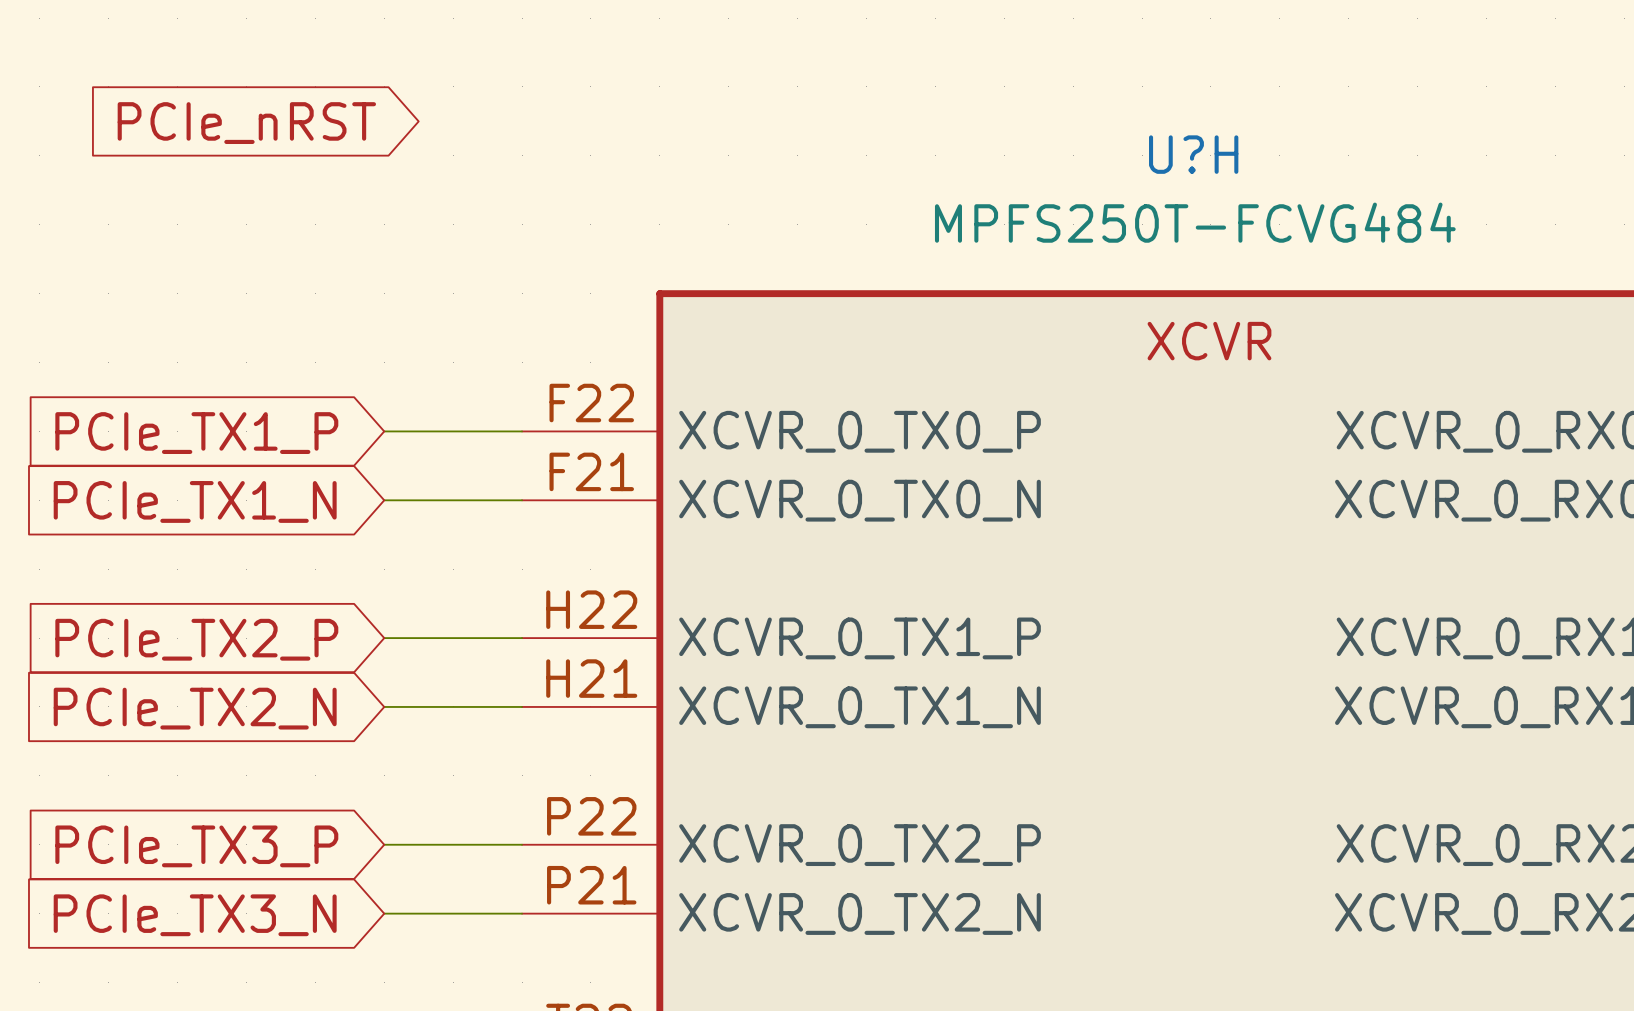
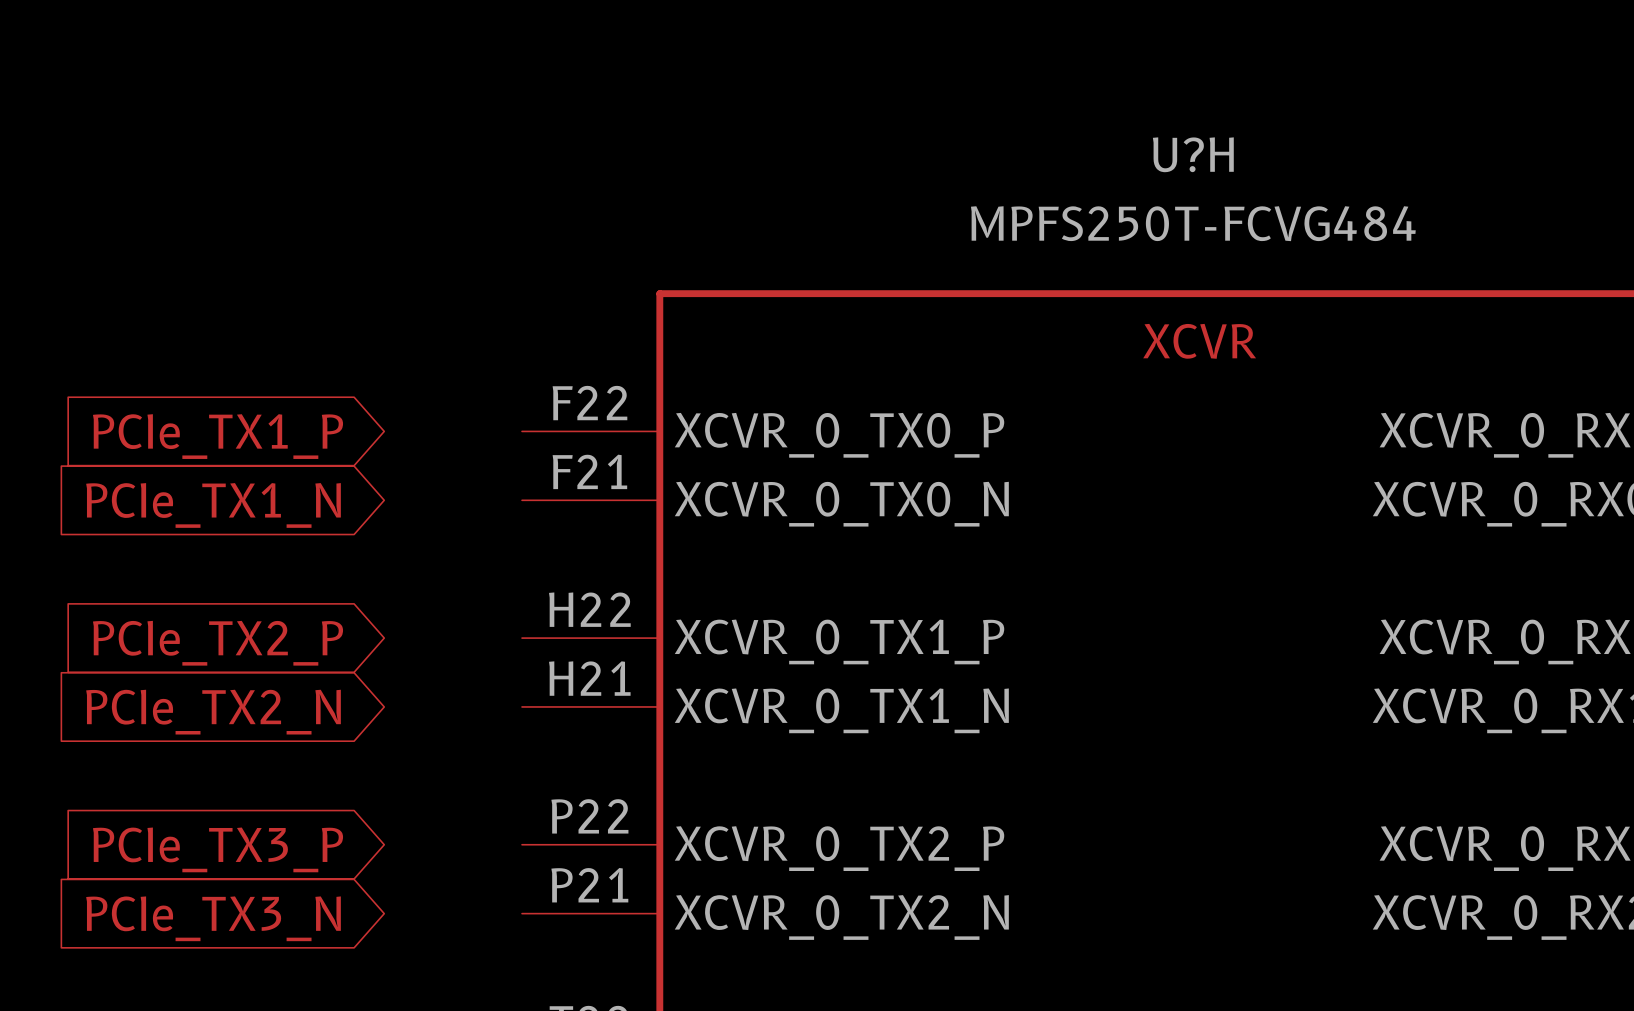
global label: PCIe_nRST (246, 123) -> none
wire: (384, 431) (522, 431) -> none
wire: (384, 500) (522, 500) -> none
wire: (384, 638) (522, 638) -> none
wire: (384, 706) (522, 706) -> none
wire: (384, 844) (522, 844) -> none
wire: (384, 913) (522, 913) -> none

